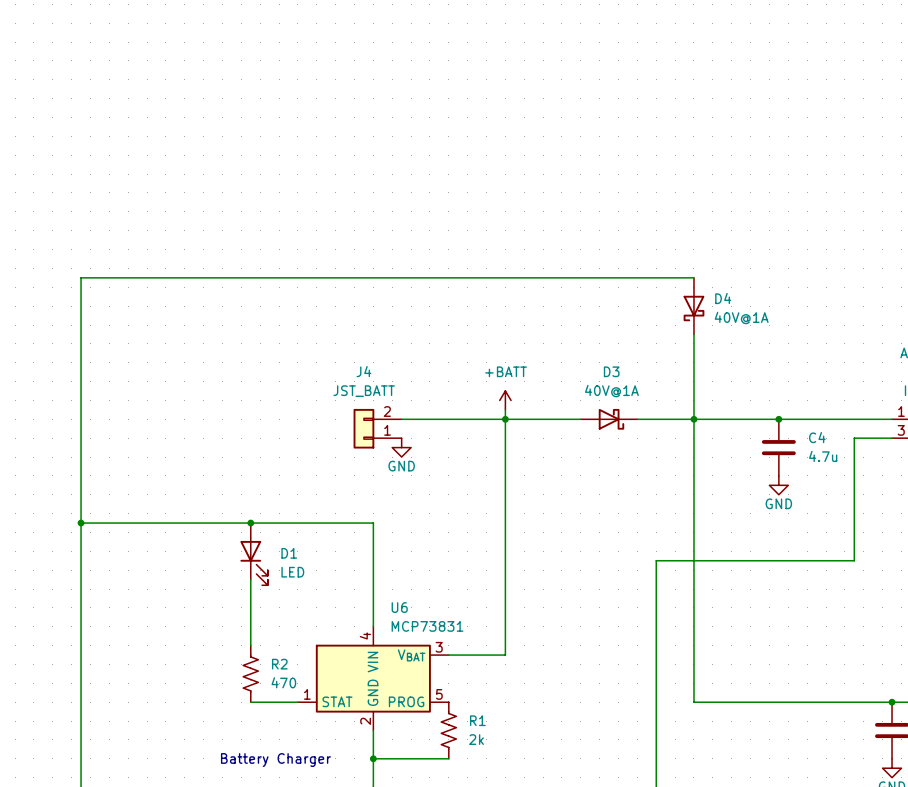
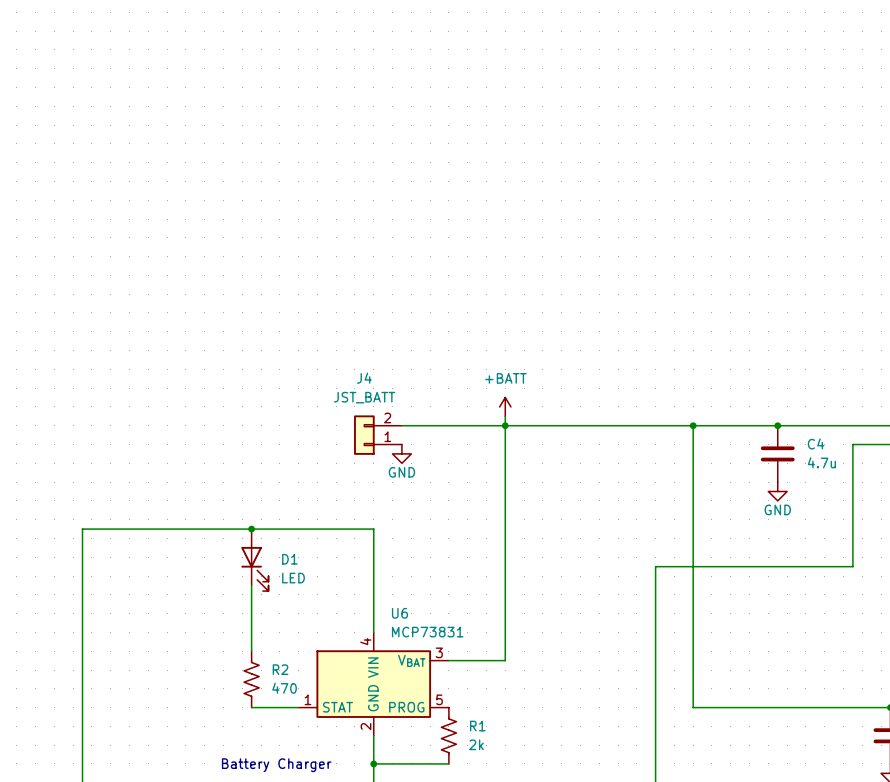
wire: (693, 277) (81, 277) (81, 523) -> none
D4: 40V@1A (693, 306) -> none
wire: (693, 334) (693, 419) -> none
D3: 40V@1A (609, 419) -> none
junction: (81, 523) -> none

